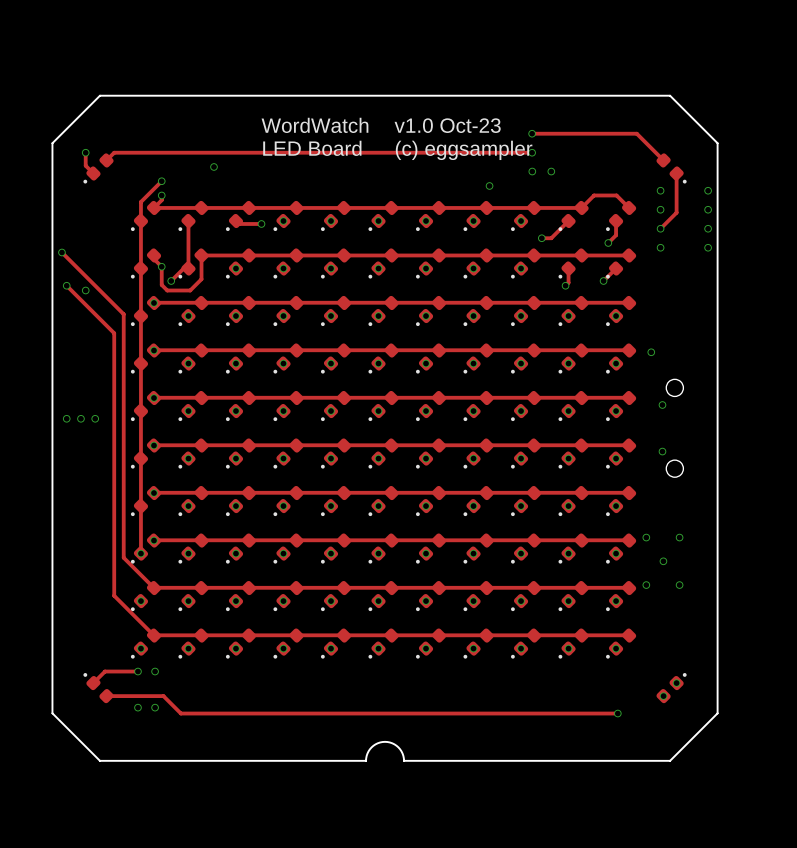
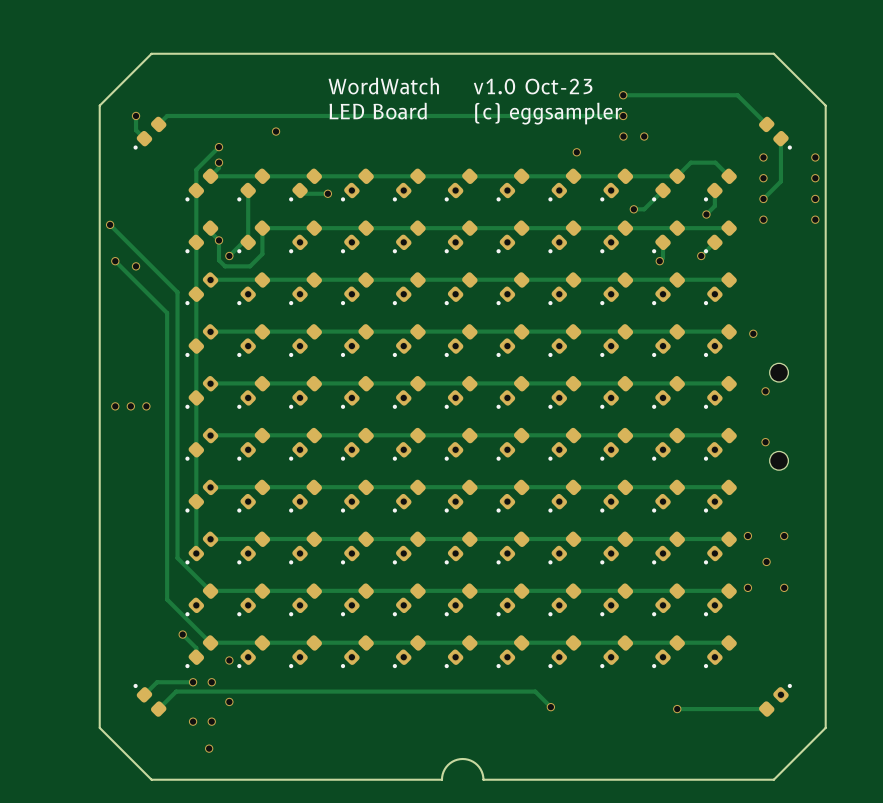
track: none -> (182, 634) (196, 648) (196, 657)
via: none -> (182, 634)
via: (140, 648) -> none
via: none -> (229, 660)
via: none -> (229, 701)
via: none -> (550, 707)
track: (106, 696) (163, 696) (180, 713) (617, 713) -> (158, 709) (176, 691) (535, 691) (550, 707)
track: none -> (677, 709) (766, 709)
via: (663, 696) -> none
via position: (617, 713) -> (677, 709)
via: none -> (209, 748)

